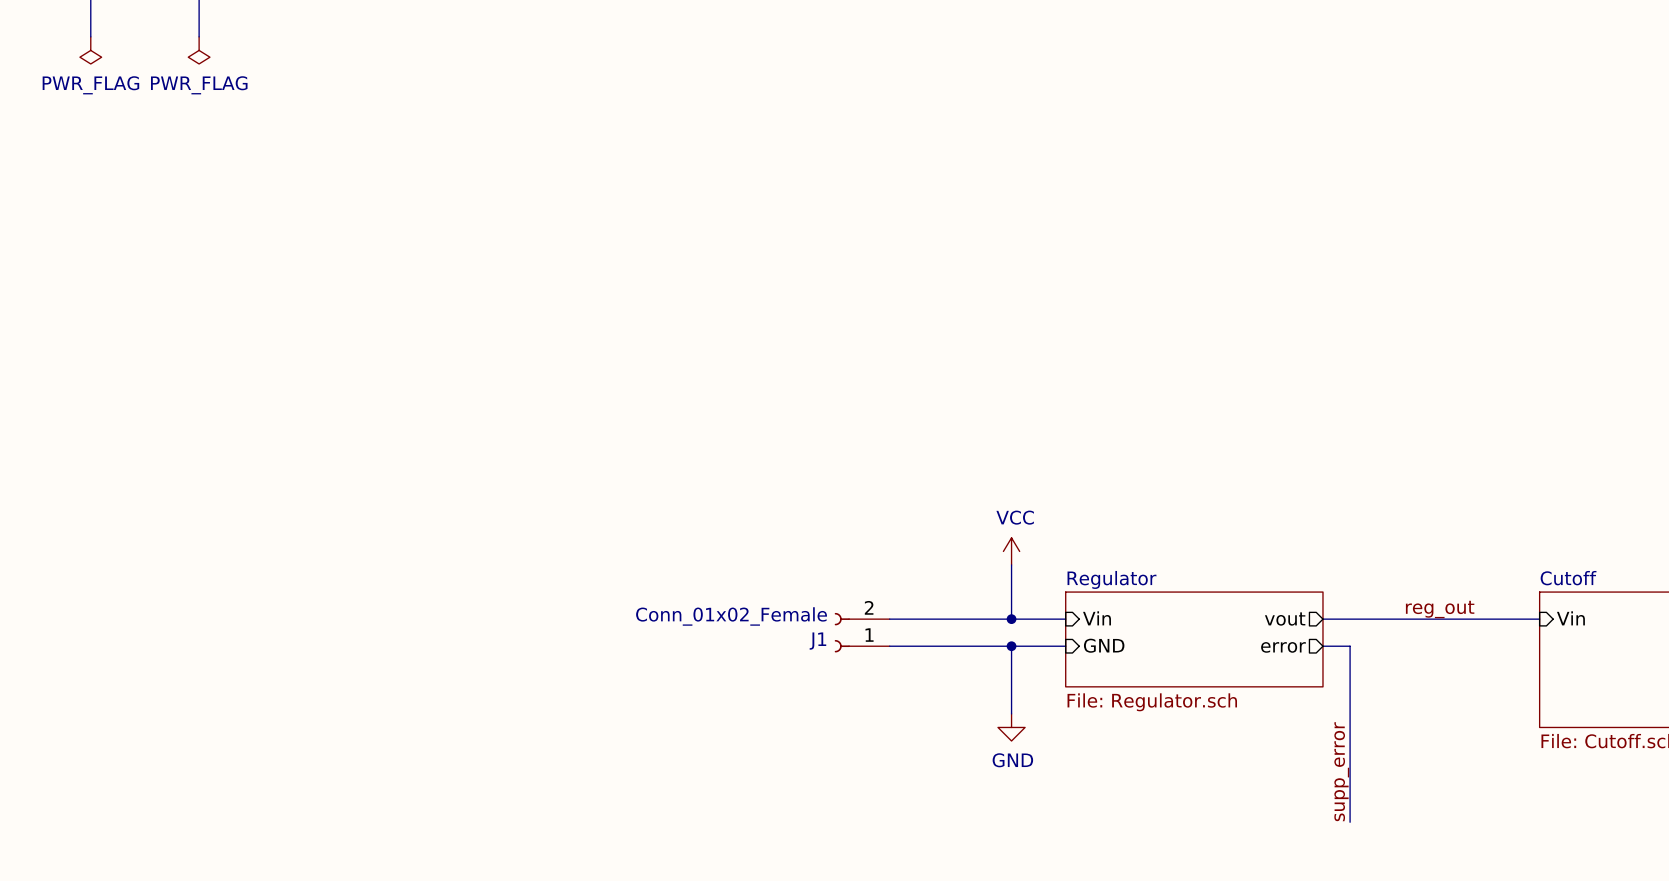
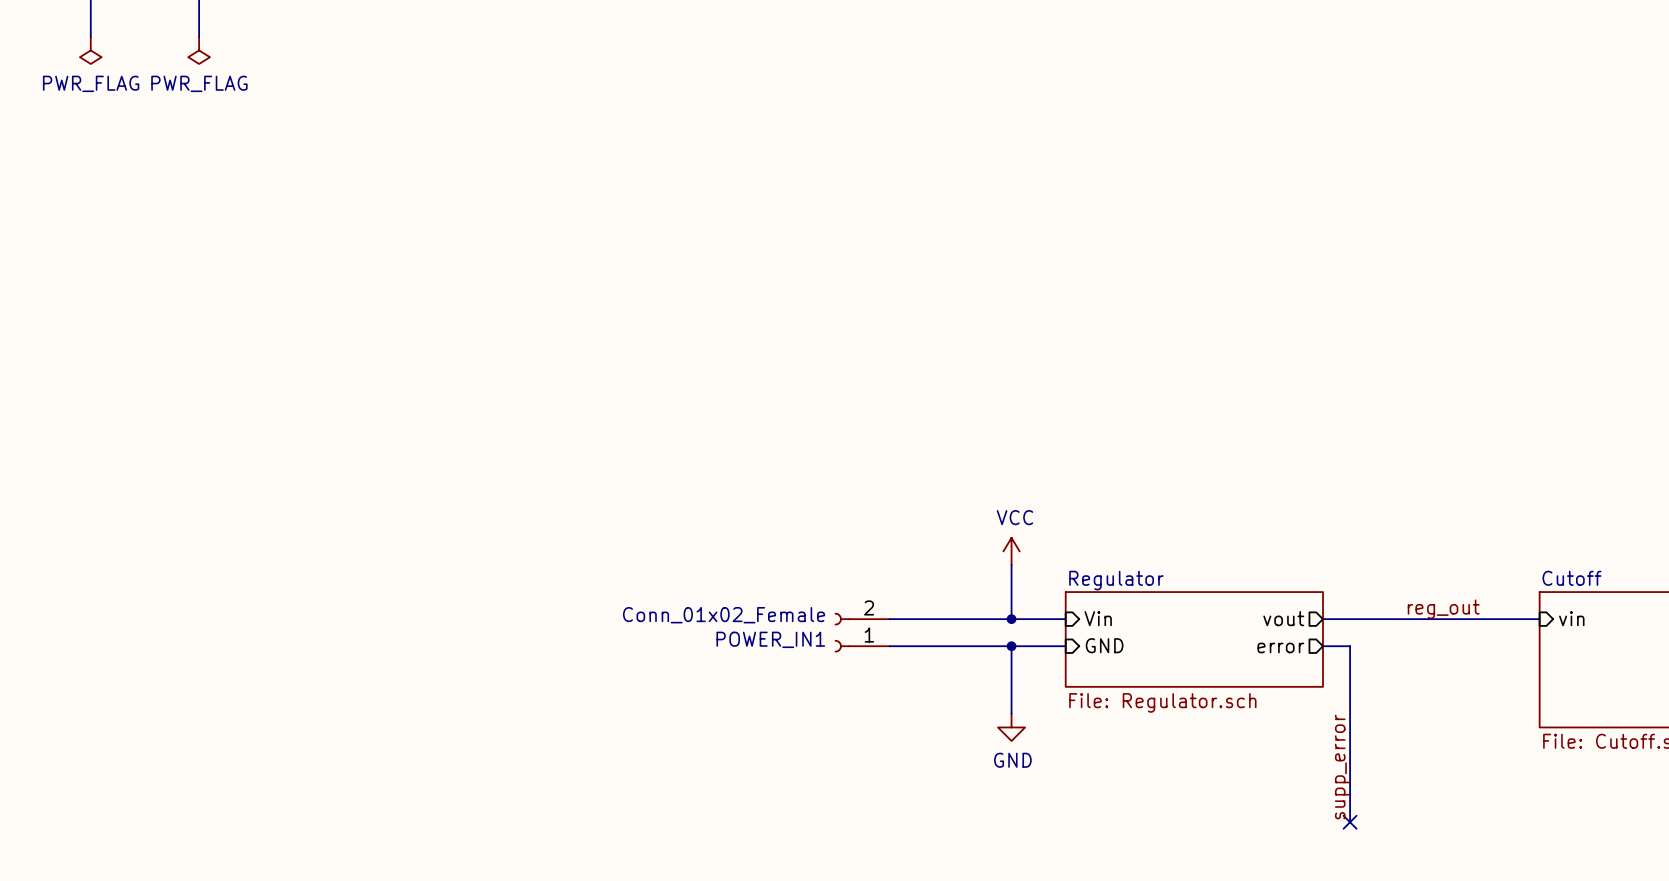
sheet pin: Vin (1570, 618) -> vin (1571, 618)
J1 name: J1 (817, 641) -> POWER_IN1 (770, 639)
no-connect mark: none -> (1350, 822)

